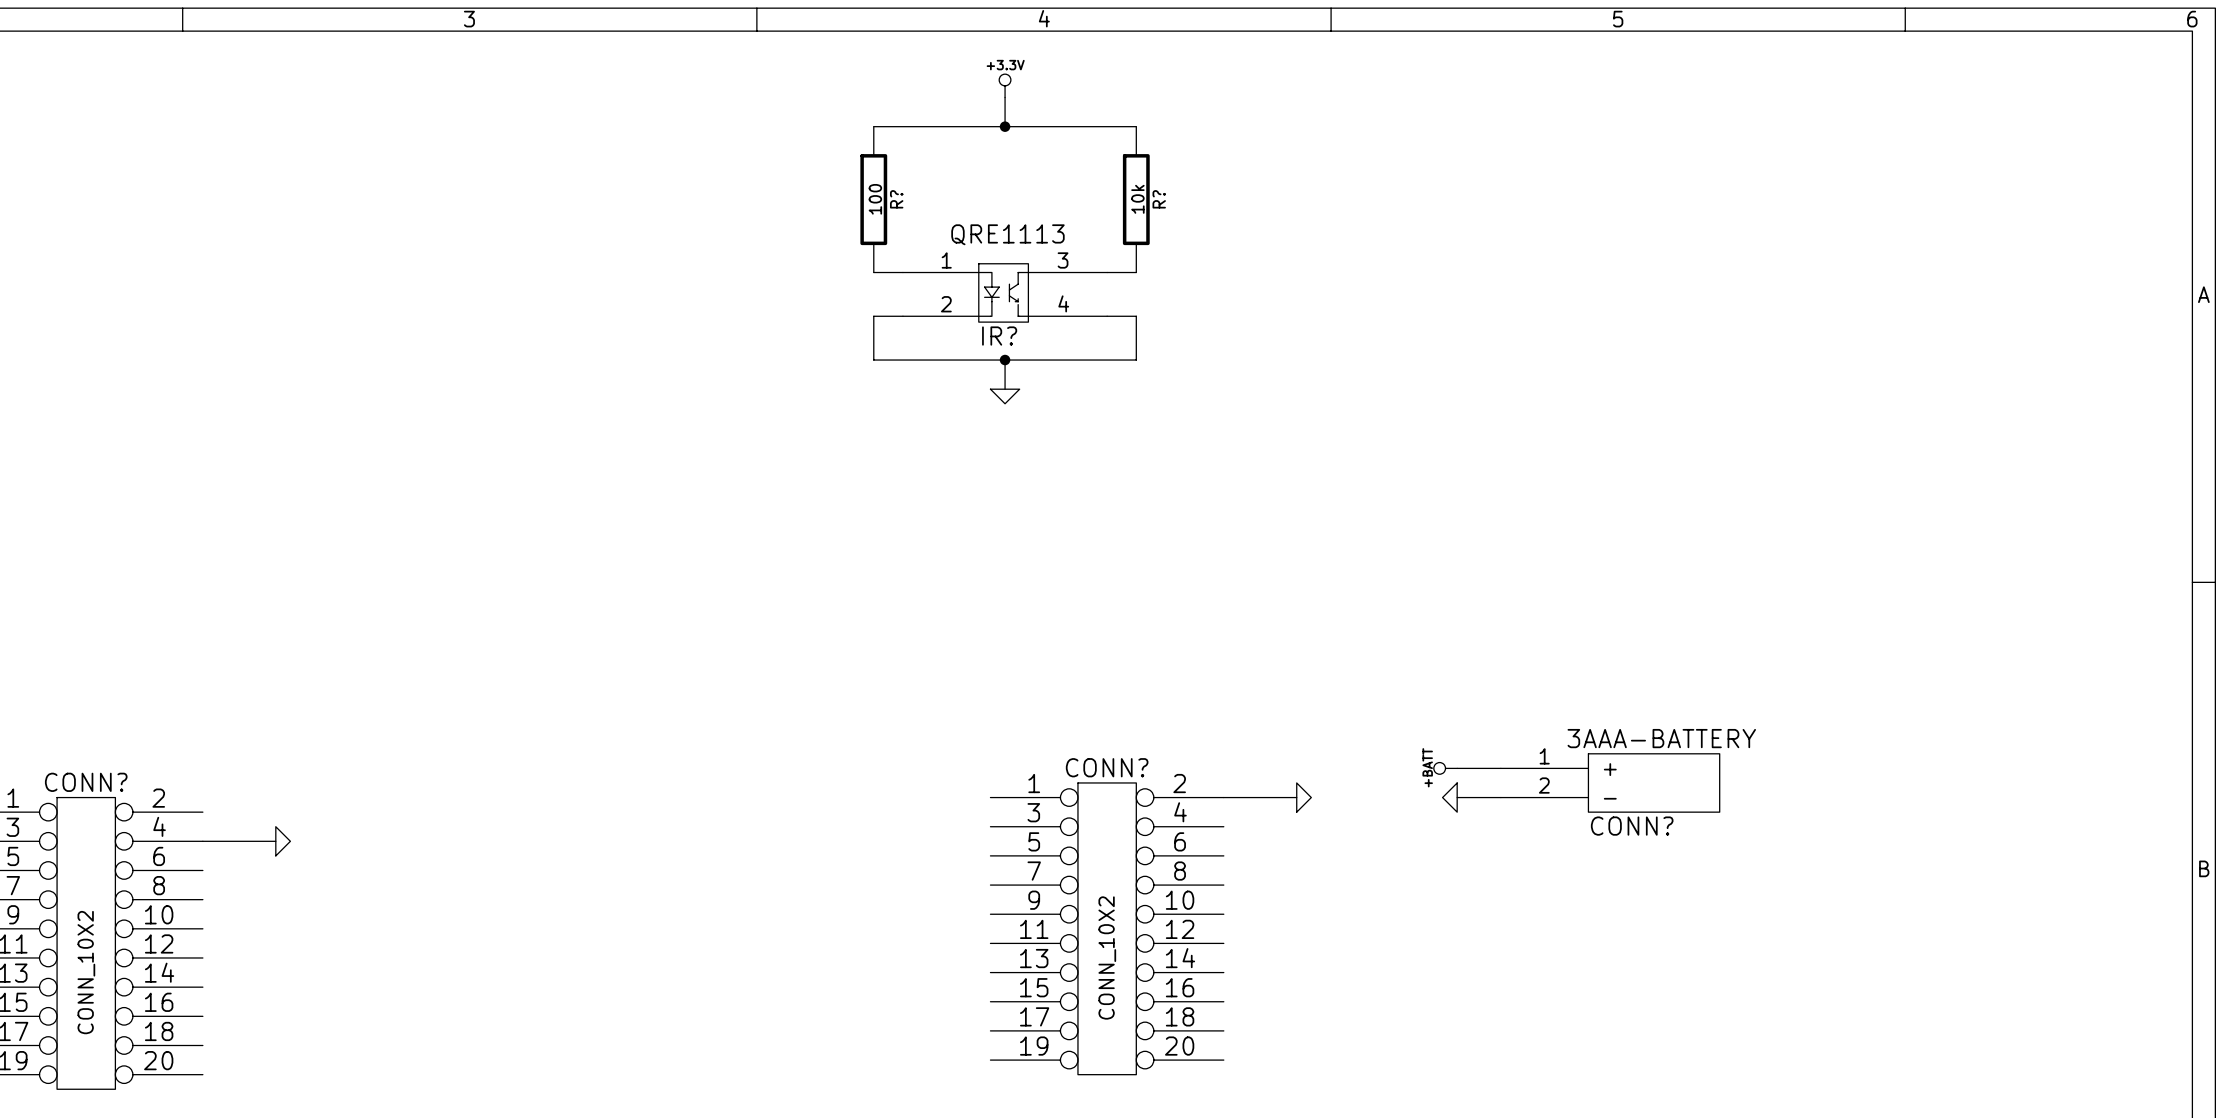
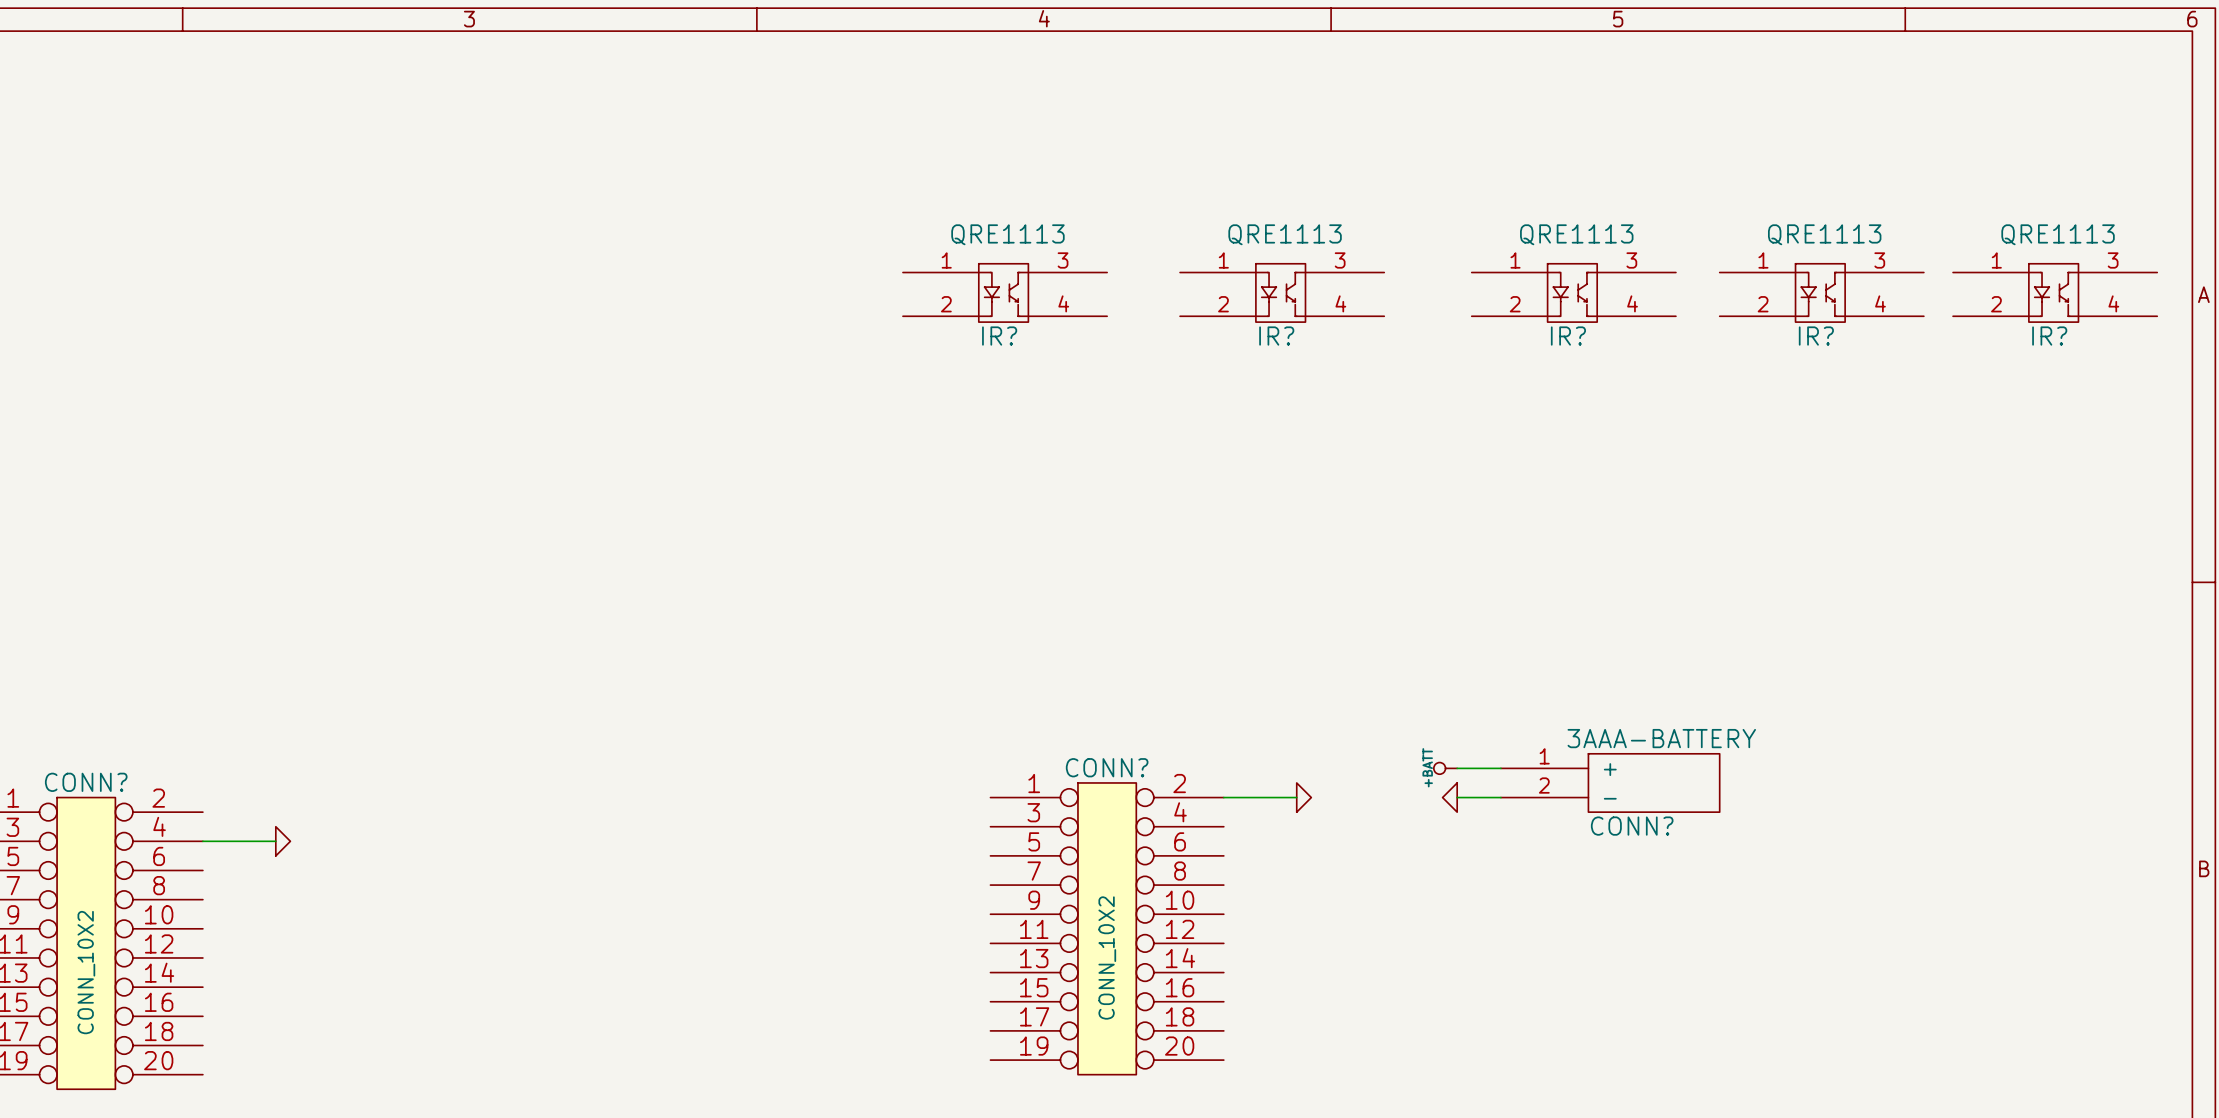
power symbol: +3.3V (1005, 85) -> none
wire: (1005, 97) (1005, 126) -> none
wire: (873, 126) (1136, 126) -> none
junction: (1005, 126) -> none
R?: 100 (873, 199) -> none
R?: 10k (1136, 199) -> none
wire: (873, 272) (902, 272) -> none
wire: (1107, 272) (1136, 272) -> none
IR?: none -> QRE1113 (1282, 292)
IR?: none -> QRE1113 (1573, 292)
IR?: none -> QRE1113 (1821, 292)
IR?: none -> QRE1113 (2055, 292)
wire: (902, 316) (873, 316) (873, 360) (1136, 360) (1136, 316) (1107, 316) -> none
wire: (1005, 360) (1005, 389) -> none
junction: (1005, 360) -> none
power symbol: (1005, 396) -> none

